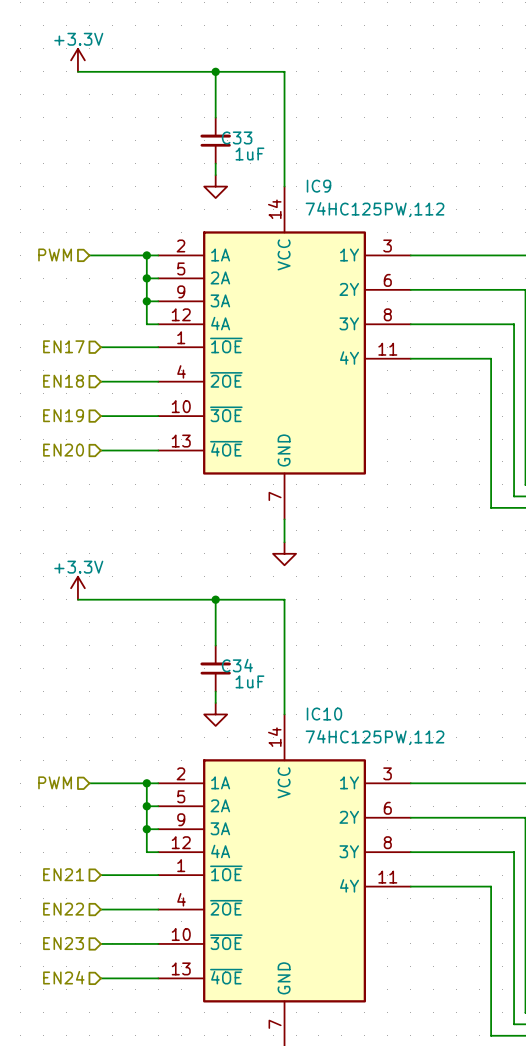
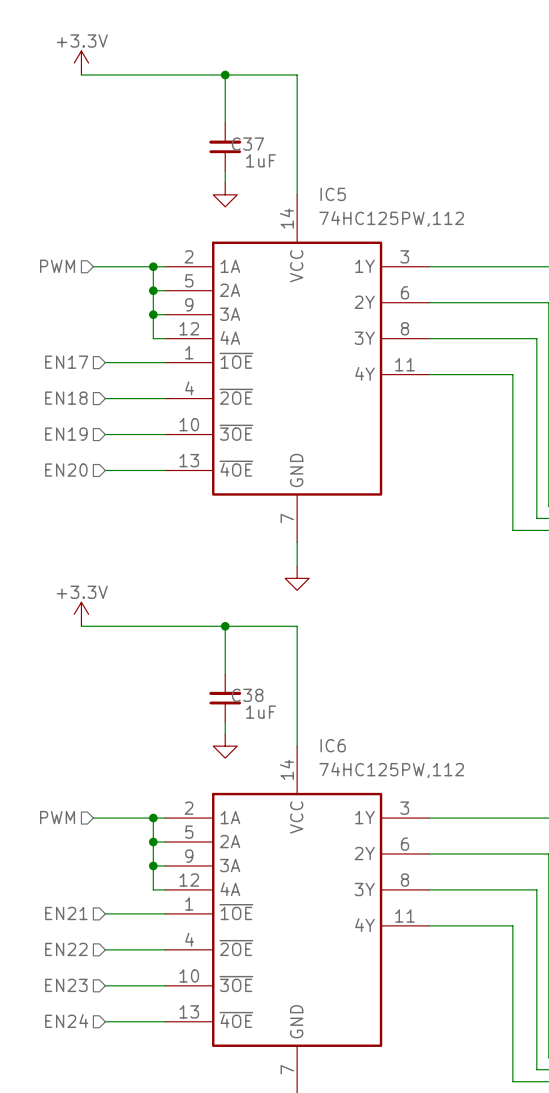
C33 name: C33 (237, 137) -> C37 (247, 144)
IC9 name: IC9 (319, 186) -> IC5 (333, 194)
C34 name: C34 (237, 665) -> C38 (247, 695)
IC10 name: IC10 (324, 714) -> IC6 (333, 745)

